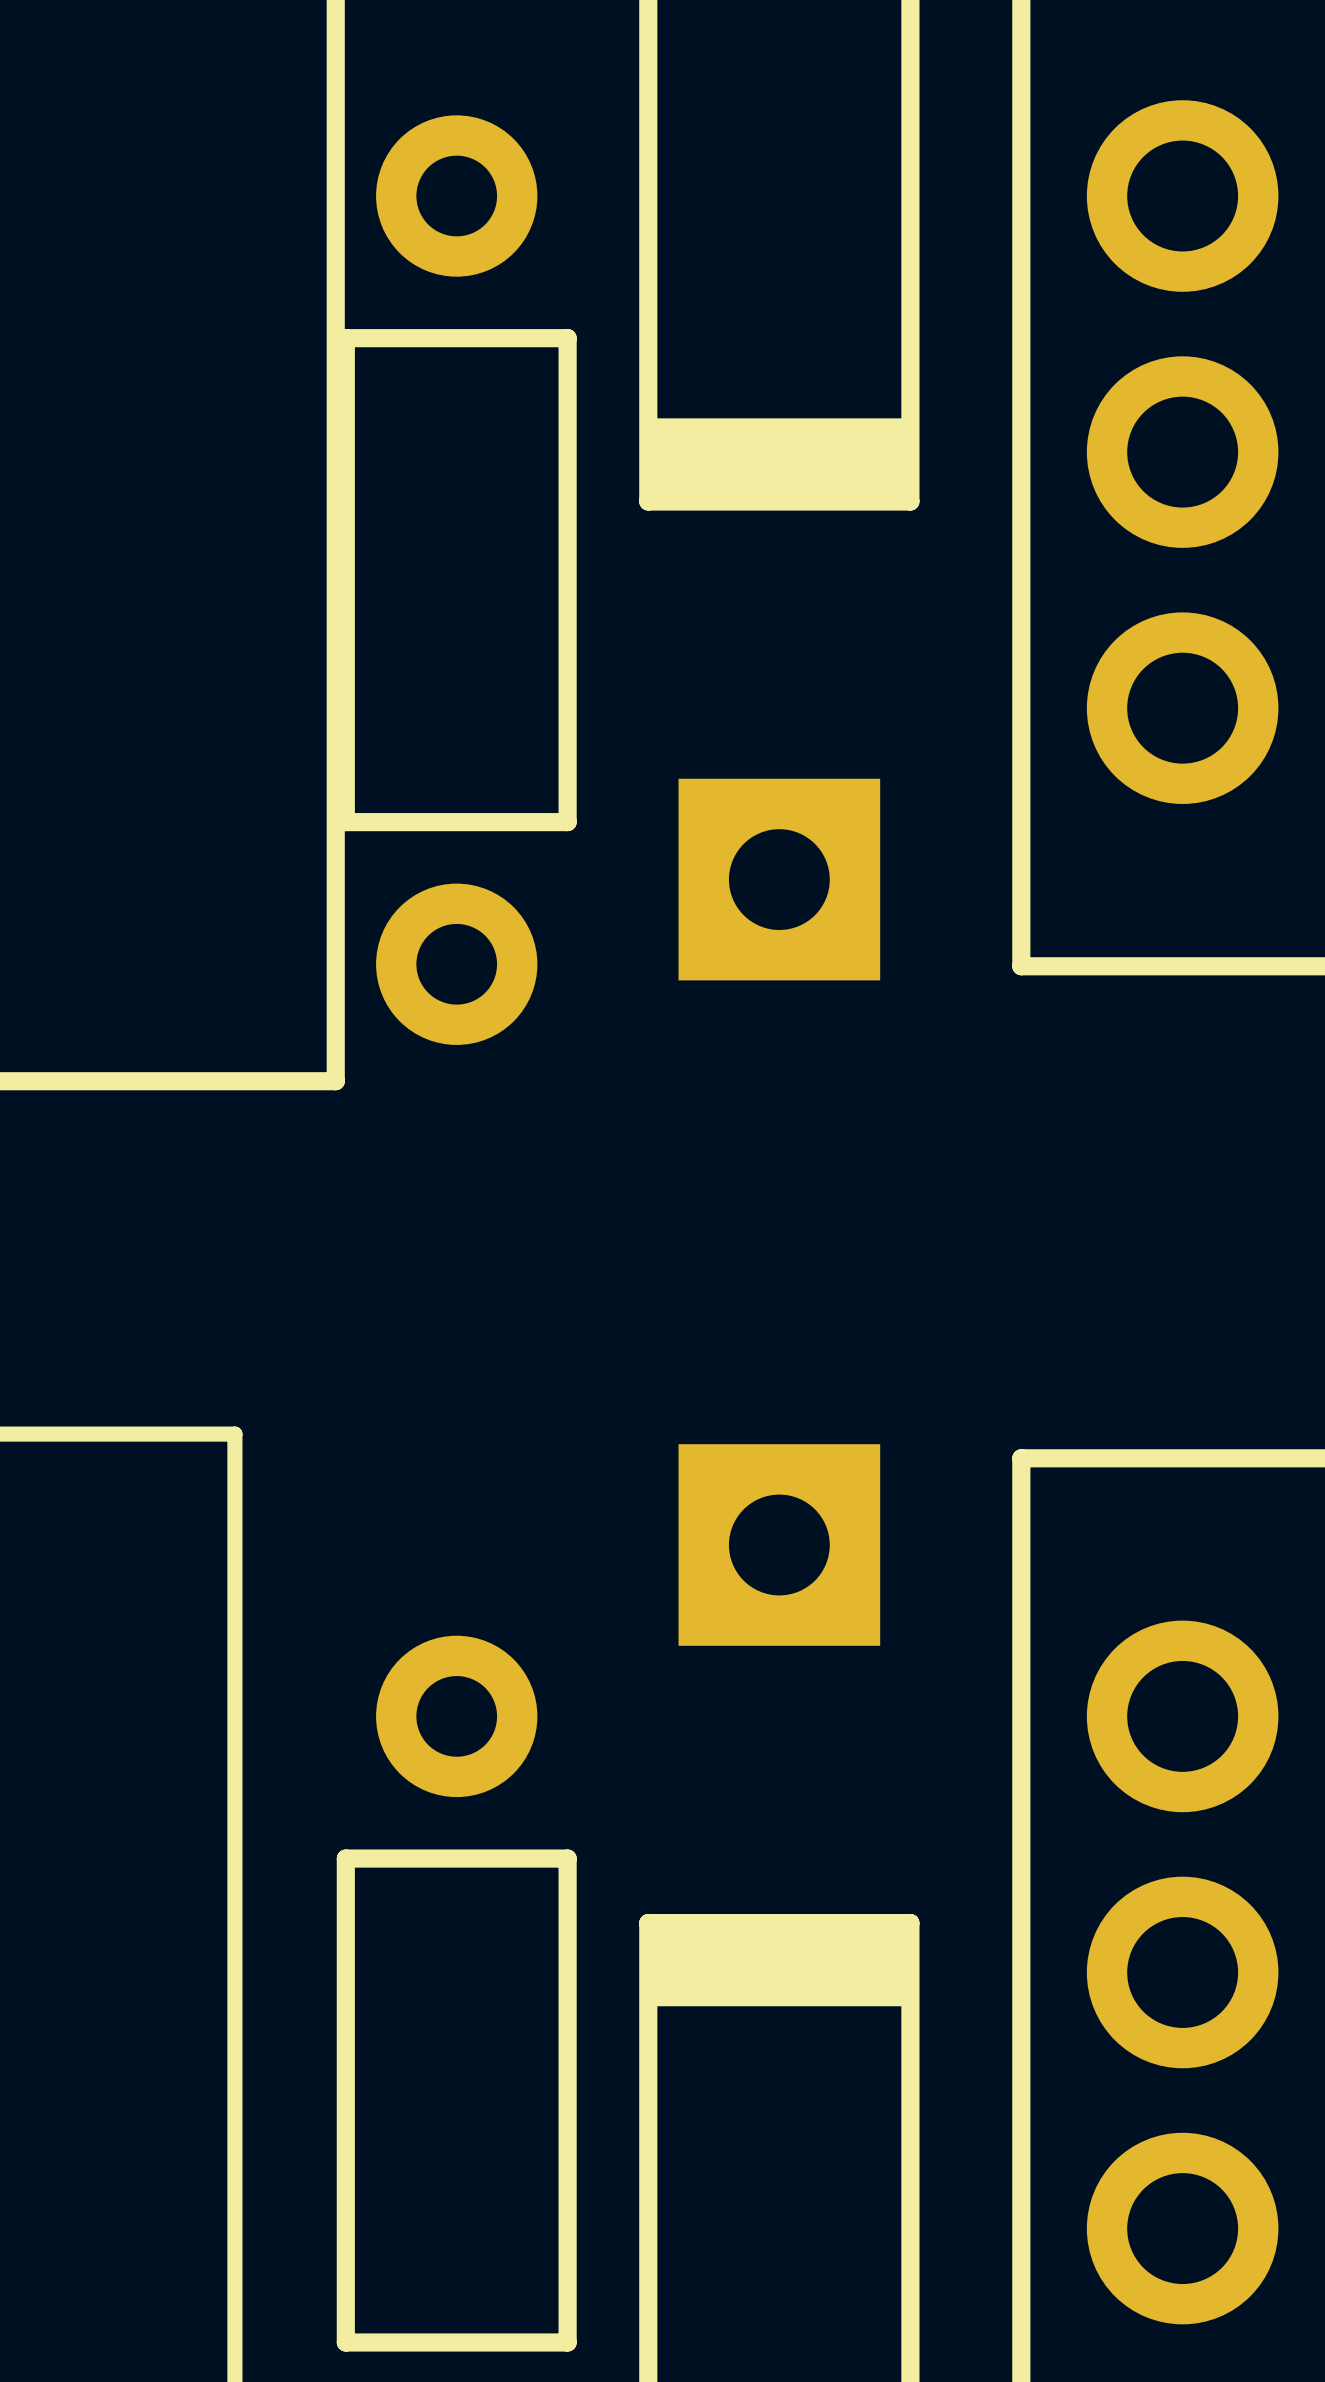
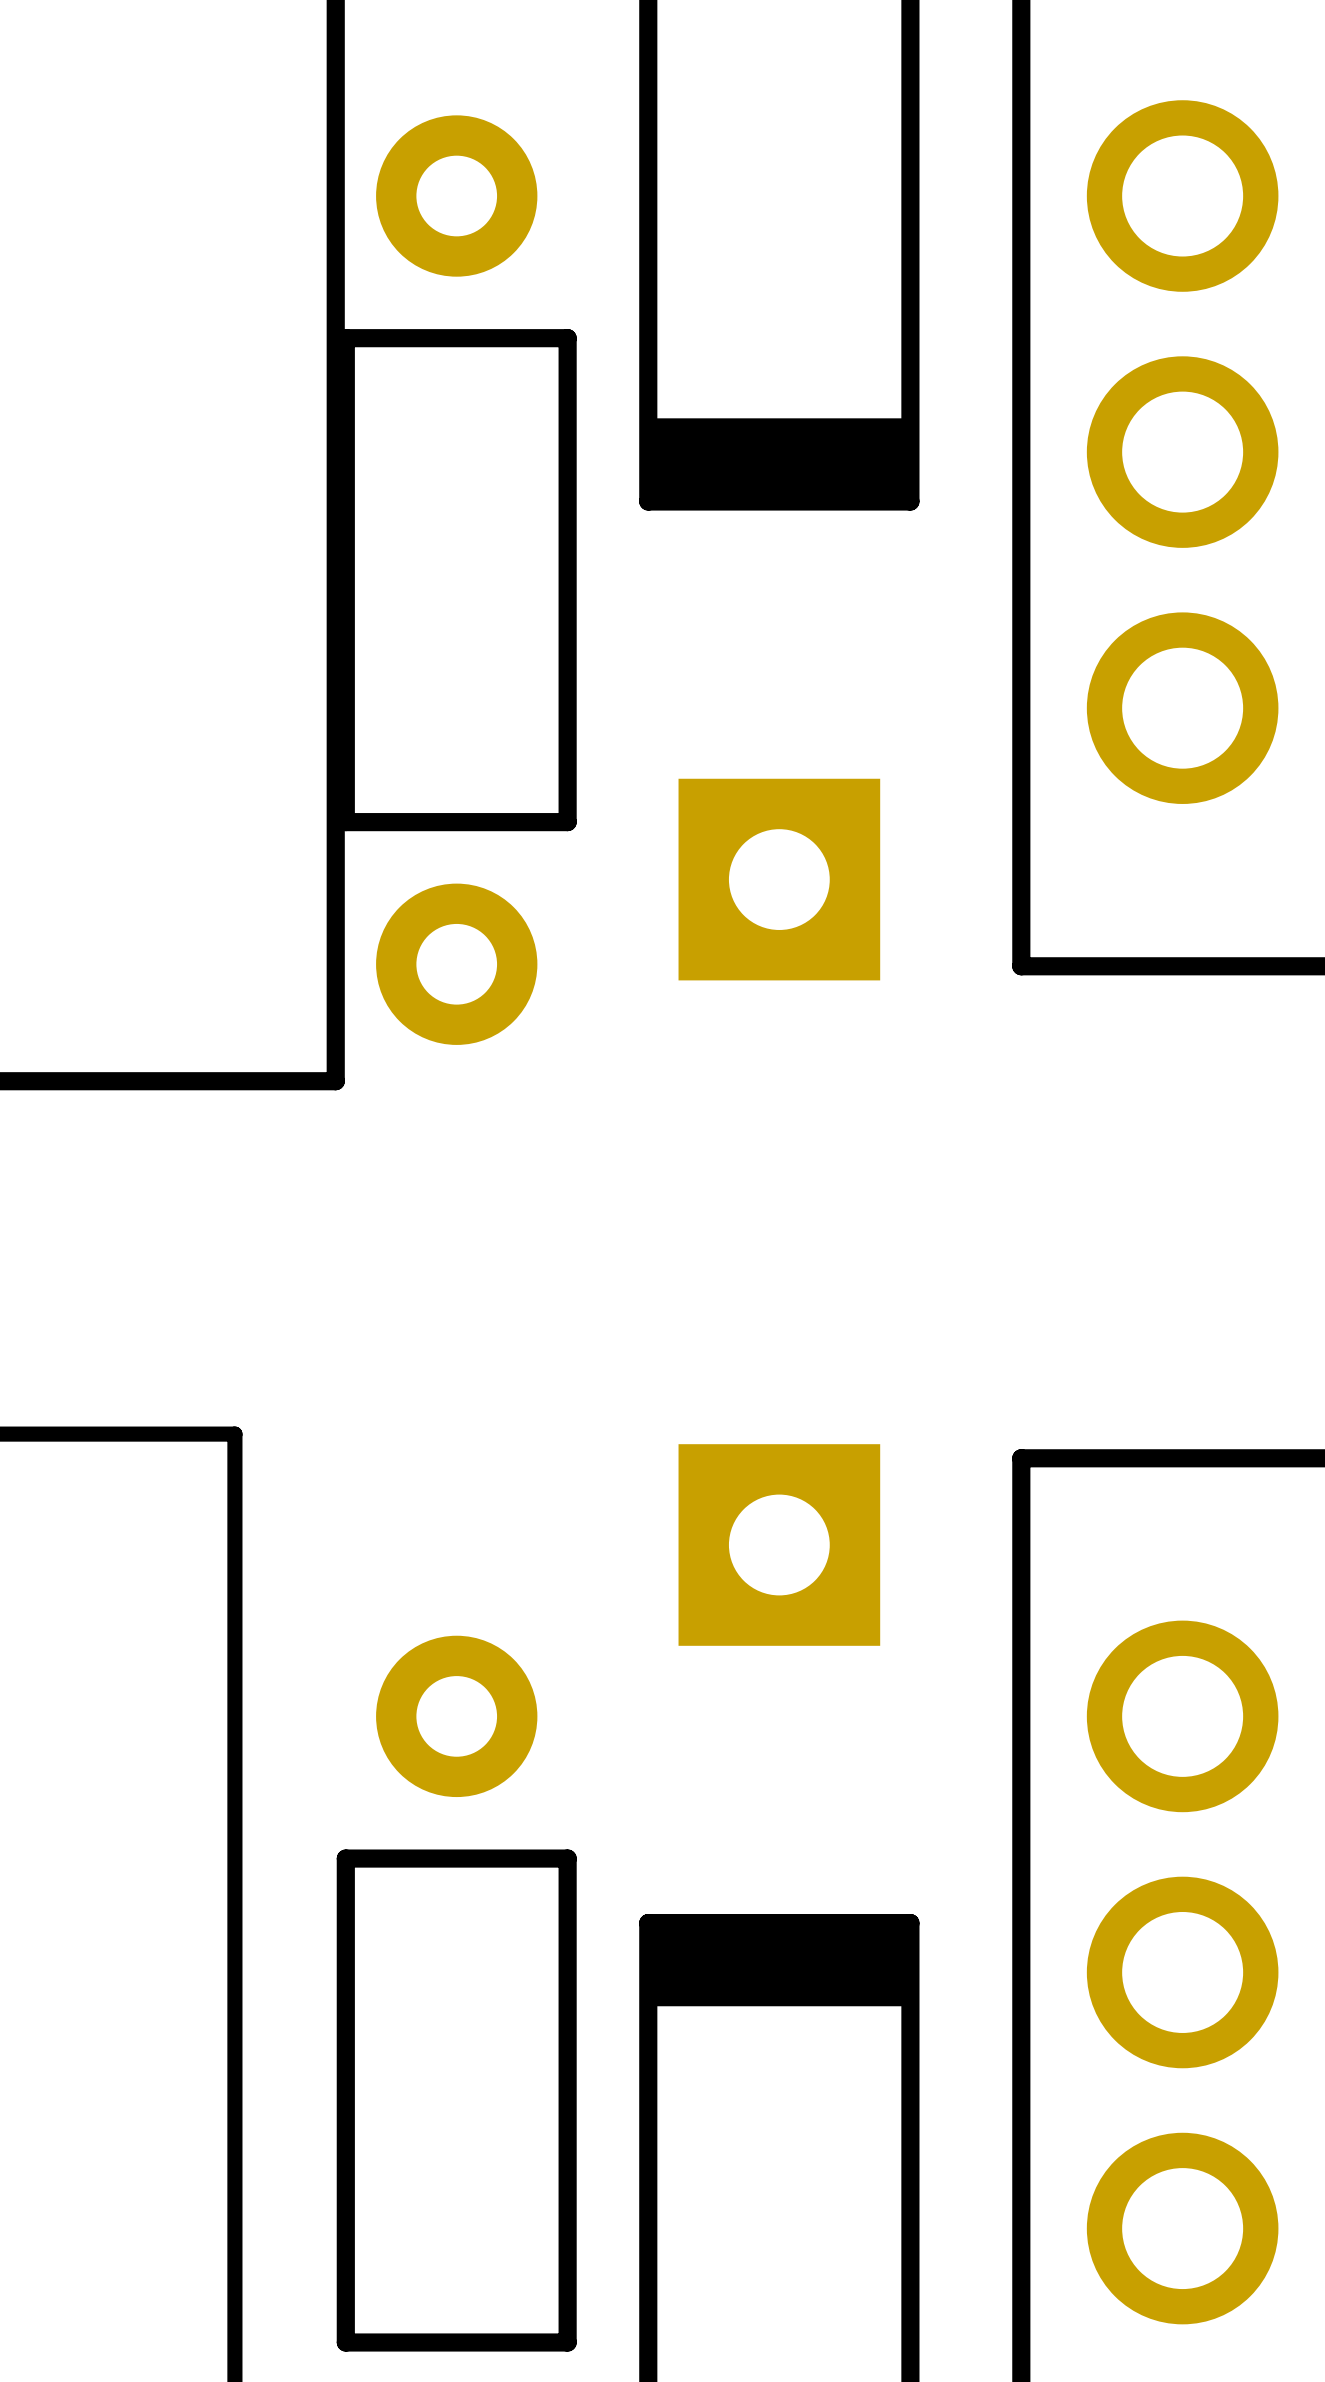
part footprint: [1086, 100, 1279, 804] -> [1086, 100, 1279, 804]
part footprint: [1086, 1620, 1279, 2325] -> [1086, 1620, 1279, 2325]

